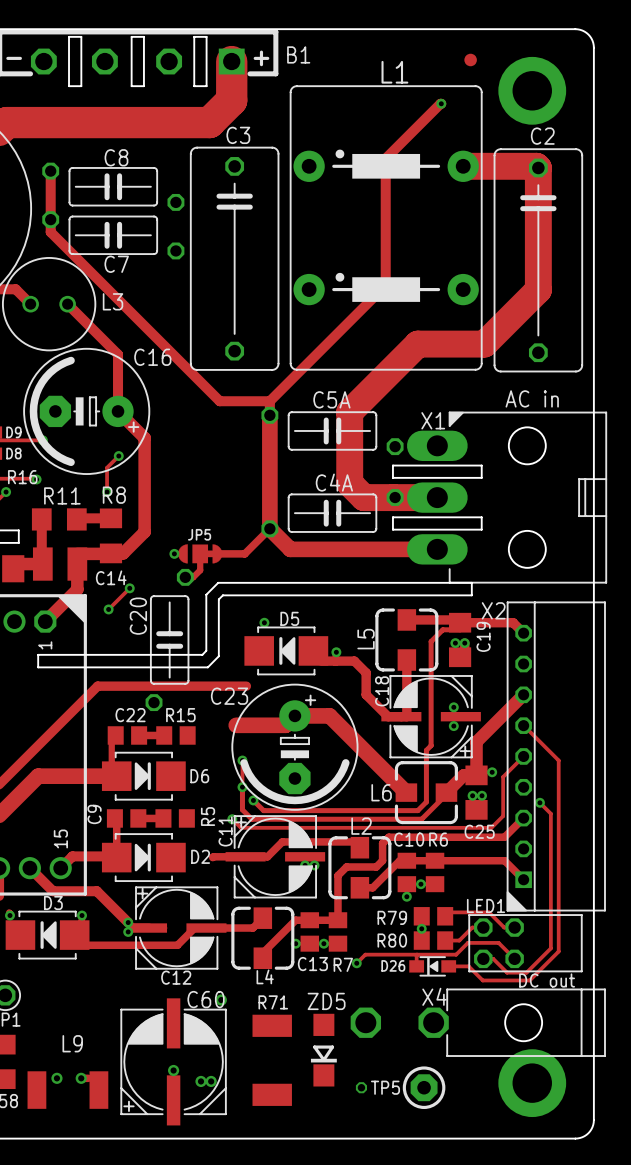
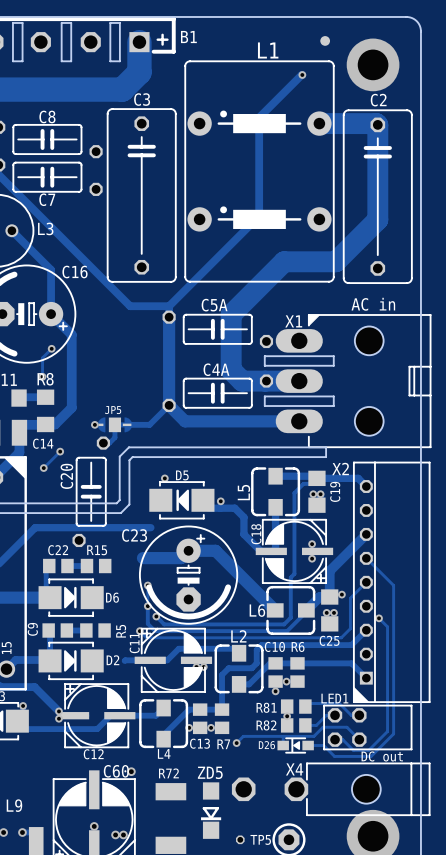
R79 name: R79 (392, 917) -> R81 (266, 707)
R80 name: R80 (392, 940) -> R82 (266, 725)
R71 name: R71 (273, 1002) -> R72 (168, 773)

